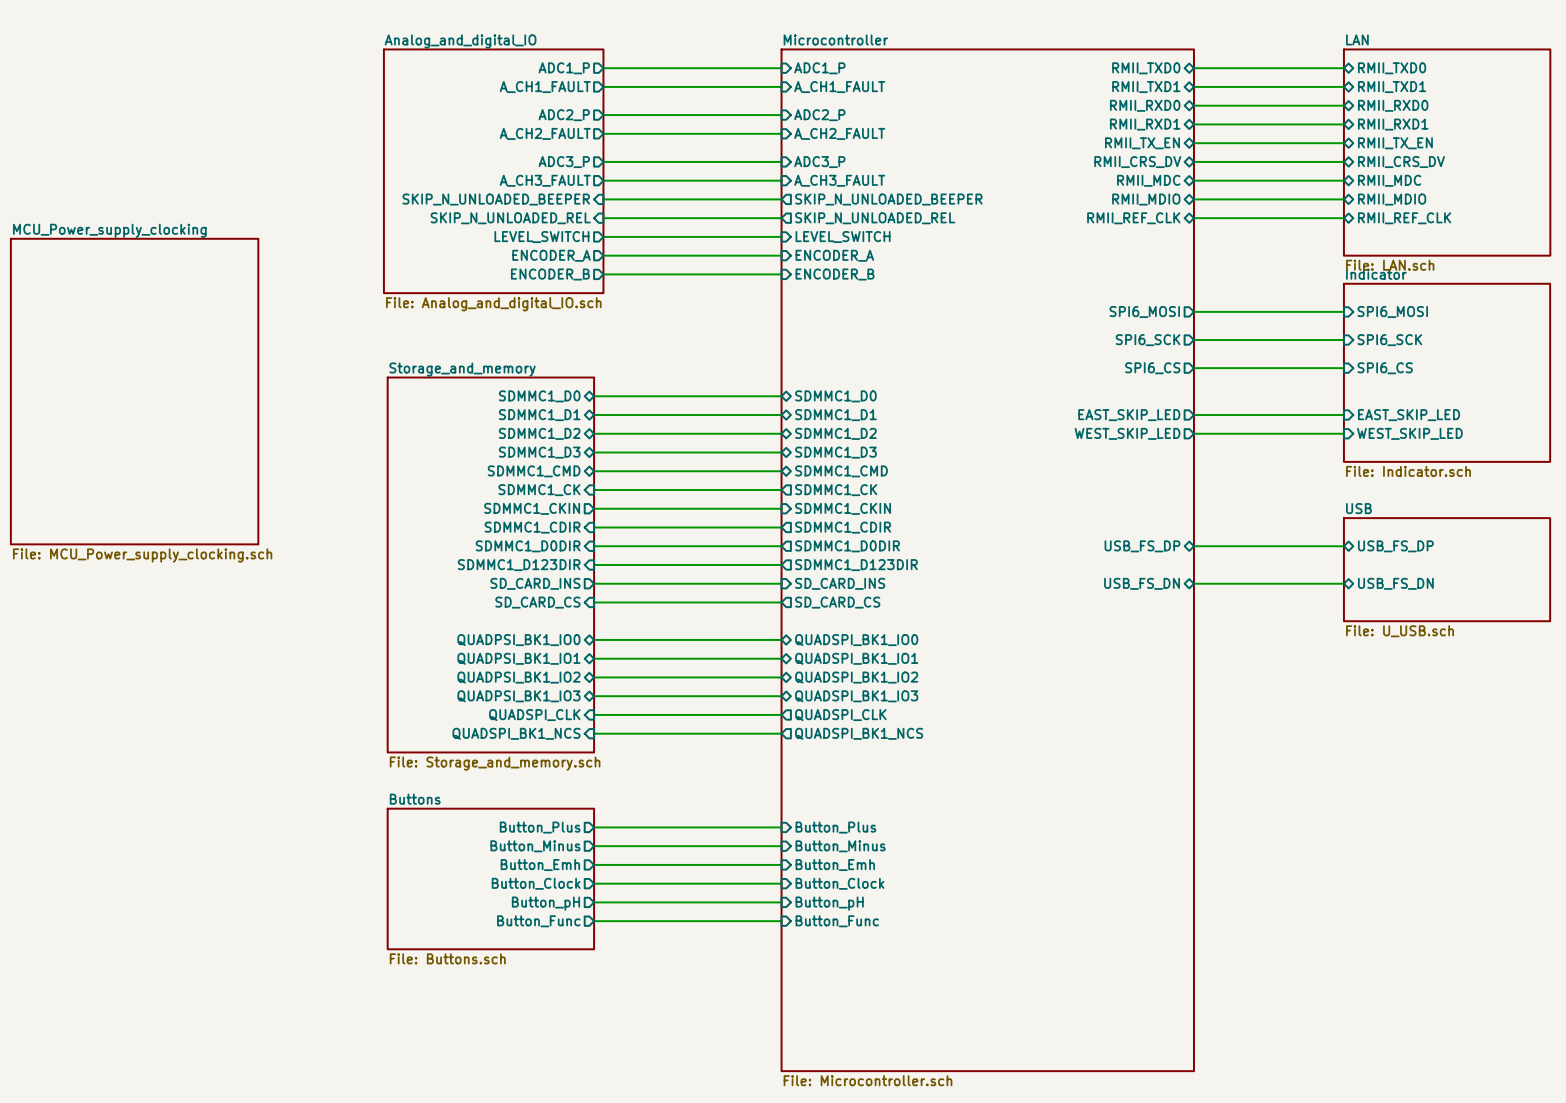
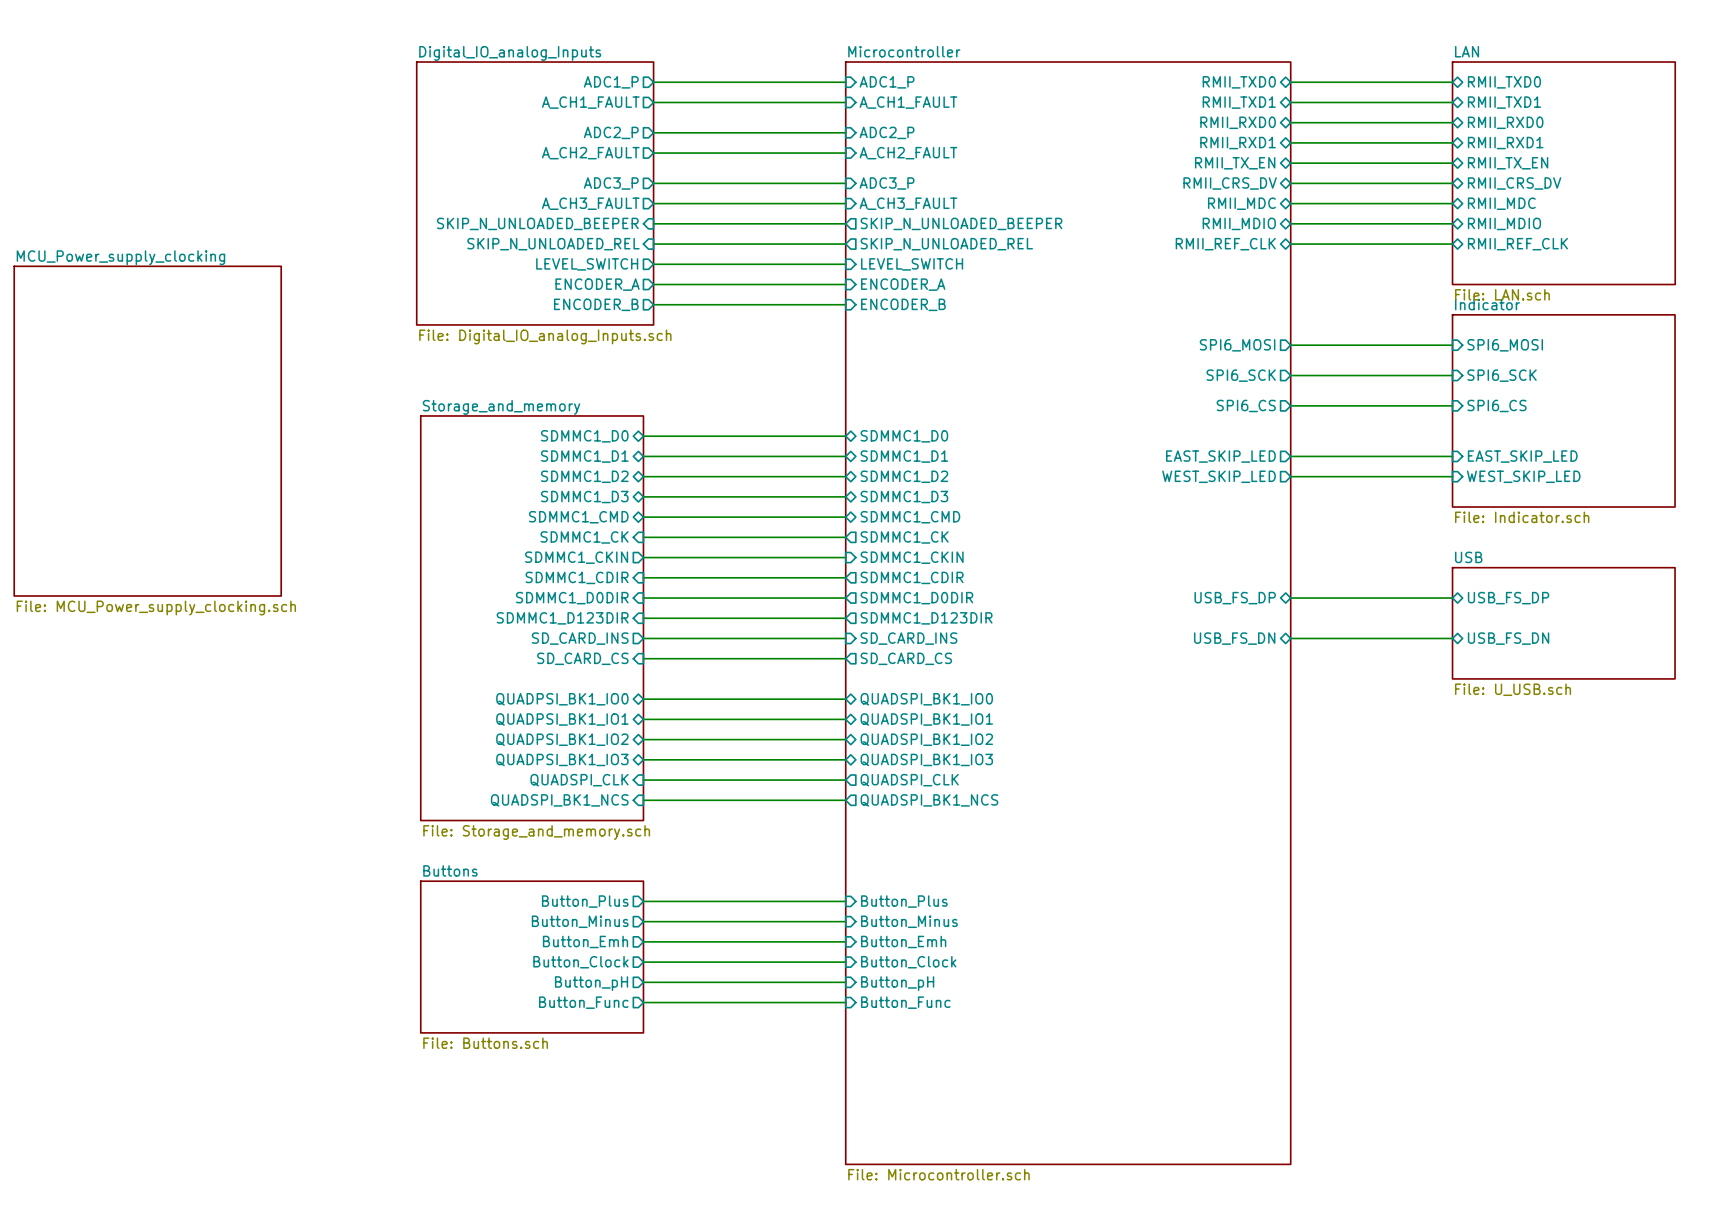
sheet Analog_and_digital_IO name: Analog_and_digital_IO (460, 41) -> Digital_IO_analog_Inputs (510, 53)
sheet Analog_and_digital_IO value: File: Analog_and_digital_IO.sch (493, 304) -> File: Digital_IO_analog_Inputs.sch (545, 336)

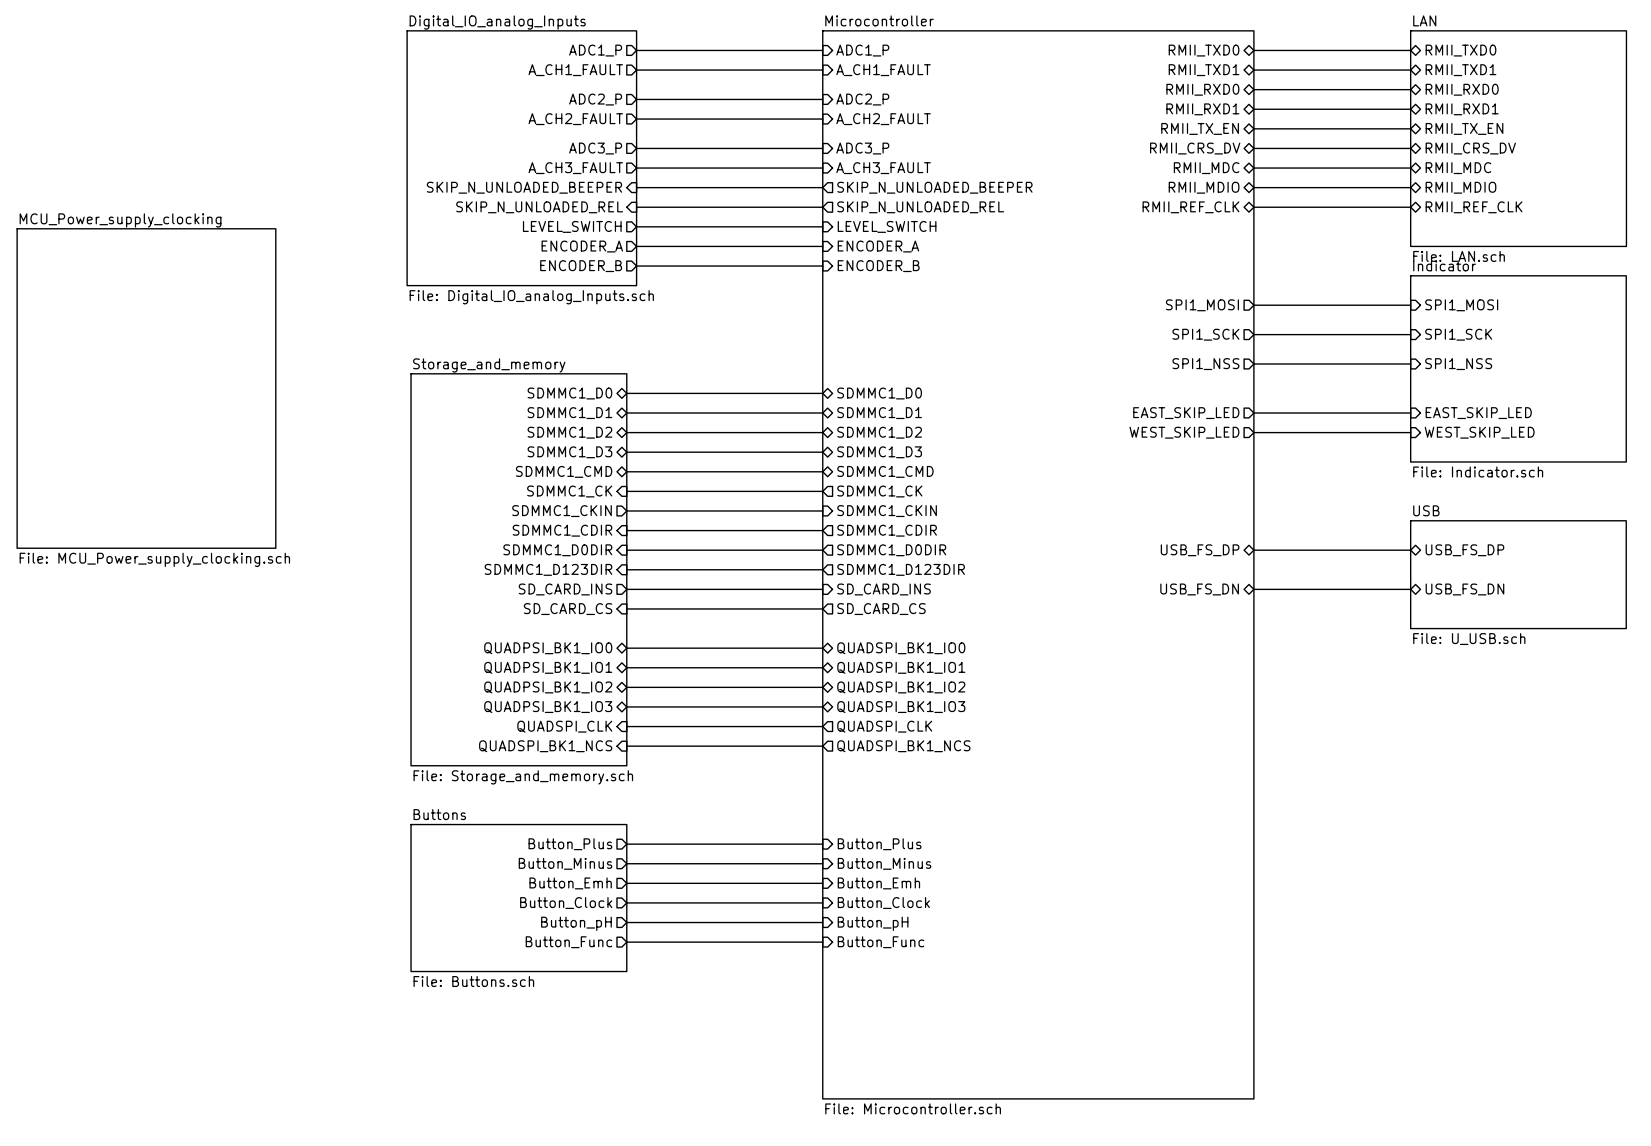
sheet pin: SPI6_MOSI (1237, 345) -> SPI1_MOSI (1202, 305)
sheet pin: SPI6_MOSI (1505, 345) -> SPI1_MOSI (1461, 305)
sheet pin: SPI6_SCK (1241, 375) -> SPI1_SCK (1205, 334)
sheet pin: SPI6_SCK (1502, 375) -> SPI1_SCK (1458, 334)
sheet pin: SPI6_CS (1246, 405) -> SPI1_NSS (1205, 364)
sheet pin: SPI6_CS (1496, 405) -> SPI1_NSS (1458, 364)

